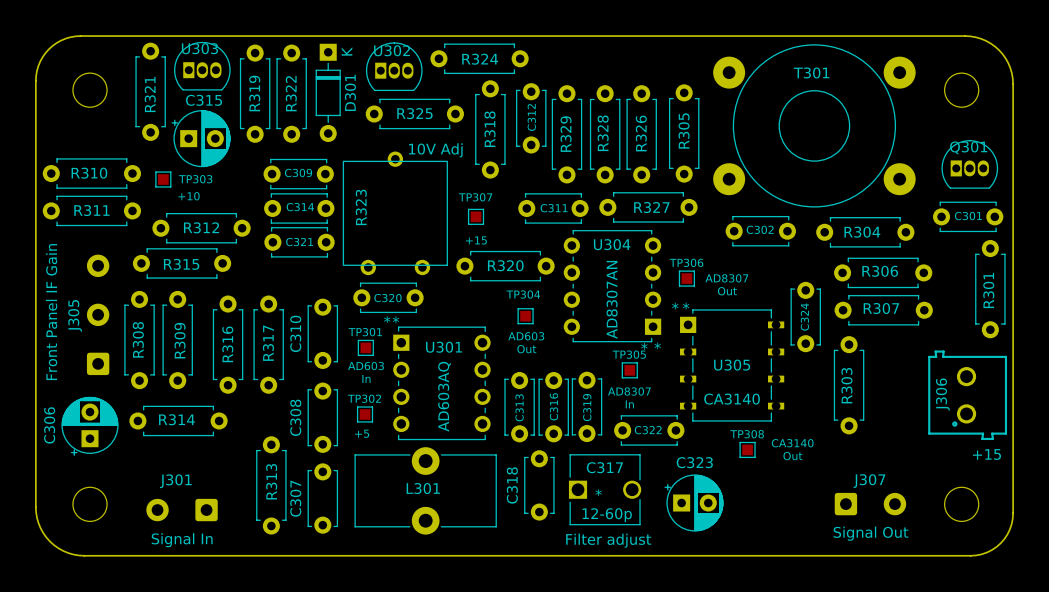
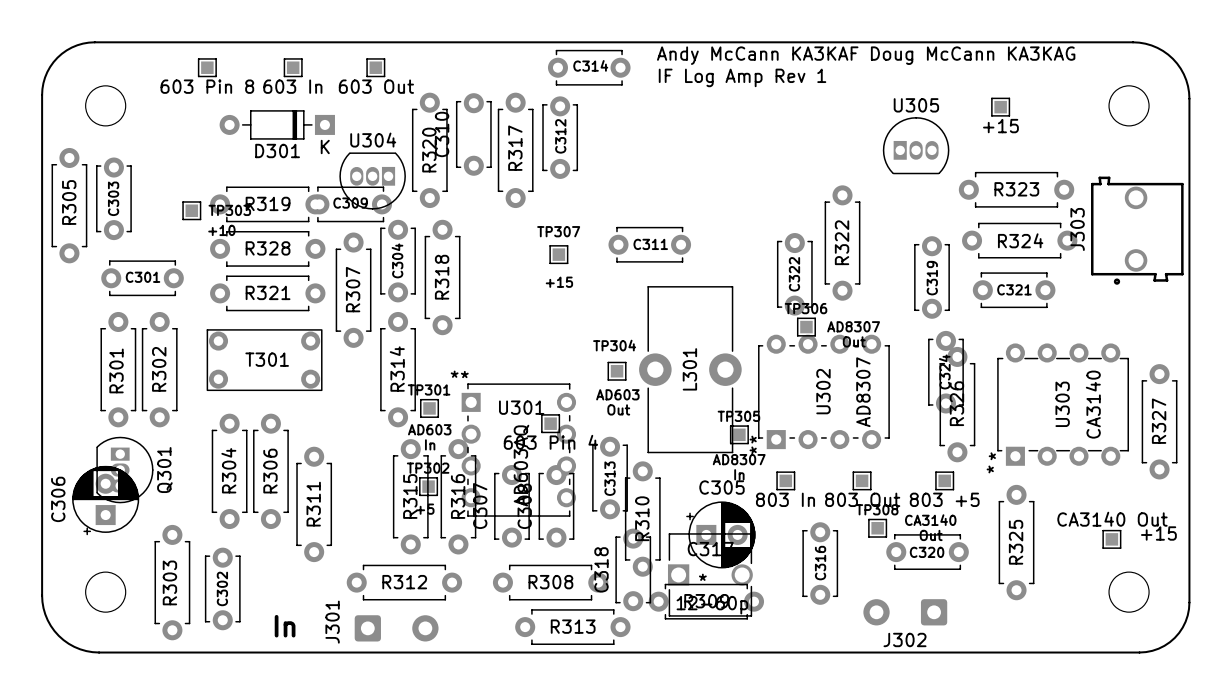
U303 footprint: [173, 41, 231, 91] -> [997, 343, 1130, 466]
U302 footprint: [365, 42, 423, 92] -> [758, 334, 890, 450]
T301 footprint: [713, 44, 916, 208] -> [206, 329, 323, 392]
text: none -> Andy McCann KA3KAF Doug McCann KA3KAG (866, 55)
part: none -> 603 Pin 8 (207, 67)
part: none -> 603 In (293, 67)
part: none -> 603 Out (375, 67)
R324 position: (479, 58) -> (1019, 240)
text: none -> IF Log Amp Rev 1 (742, 77)
T301 name position: T301 (811, 72) -> T301 (267, 359)
R321 rotation: 0° (150, 91) -> 90° clockwise (267, 293)
R321 position: (150, 91) -> (267, 293)
part: none -> +15 (1000, 107)
D301 rotation: 0° (328, 92) -> 90° clockwise (277, 124)
D301 position: (328, 92) -> (277, 124)
R319 rotation: 0° (255, 93) -> 90° clockwise (267, 204)
R319 position: (255, 93) -> (267, 204)
R322 position: (291, 93) -> (842, 243)
R325 rotation: 0° (414, 113) -> 90° clockwise (1016, 542)
R325 position: (414, 113) -> (1016, 542)
C312 position: (531, 118) -> (560, 137)
R318 position: (490, 129) -> (442, 277)
R305 position: (684, 133) -> (69, 205)
R329: (566, 134) -> none
R328 rotation: 0° (605, 134) -> 90° clockwise (267, 248)
R328 position: (605, 134) -> (267, 248)
R326 position: (641, 134) -> (957, 404)
C315: (201, 138) -> none
text: 10V Adj (435, 150) -> none
R323 footprint: [342, 151, 448, 276] -> [958, 171, 1075, 208]
Q301 rotation: 0° (969, 164) -> 90° clockwise (124, 470)
Q301 position: (969, 164) -> (124, 470)
C303: none -> (113, 198)
R310 rotation: 0° (91, 173) -> 90° clockwise (642, 519)
R310 position: (91, 173) -> (642, 519)
J303: none -> (1137, 230)
R323 name position: R323 (361, 207) -> R323 (1016, 189)
R327 rotation: 0° (648, 207) -> 90° clockwise (1159, 421)
R327 position: (648, 207) -> (1159, 421)
C314 position: (299, 208) -> (589, 67)
R311 rotation: 0° (91, 210) -> 90° clockwise (314, 504)
R311 position: (91, 210) -> (314, 504)
C301 position: (968, 216) -> (142, 278)
C304: none -> (398, 261)
R312 position: (201, 228) -> (404, 582)
U304 footprint: [563, 230, 662, 343] -> [339, 152, 406, 210]
C302 rotation: 0° (760, 231) -> 90° clockwise (222, 588)
C302 position: (760, 231) -> (222, 588)
R304 rotation: 0° (865, 232) -> 90° clockwise (229, 471)
R304 position: (865, 232) -> (229, 471)
C321 position: (299, 242) -> (1014, 290)
R315 rotation: 0° (182, 263) -> 90° clockwise (410, 496)
R315 position: (182, 263) -> (410, 496)
R320 rotation: 0° (505, 266) -> 90° clockwise (429, 150)
R320 position: (505, 266) -> (429, 150)
R306 rotation: 0° (883, 272) -> 90° clockwise (270, 471)
R306 position: (883, 272) -> (270, 471)
R301 position: (990, 289) -> (118, 369)
C320 position: (388, 297) -> (927, 552)
U304 value: AD8307AN (612, 299) -> none
U305 footprint: [680, 309, 785, 422] -> [882, 117, 950, 175]
R307 rotation: 0° (883, 310) -> 90° clockwise (353, 290)
R307 position: (883, 310) -> (353, 290)
text: Front Panel IF Gain (51, 312) -> none
J305: (98, 314) -> none
R302: none -> (159, 369)
C310 position: (322, 333) -> (473, 134)
U302 value: none -> AD8307 (863, 392)
R308 rotation: 0° (139, 340) -> 90° clockwise (550, 582)
R308 position: (139, 340) -> (550, 582)
R309 rotation: 0° (177, 340) -> 90° clockwise (706, 601)
R309 position: (177, 340) -> (706, 601)
R316 position: (228, 344) -> (458, 496)
R317 position: (268, 344) -> (515, 150)
U303 value: none -> CA3140 (1093, 404)
part: none -> 603 Pin 4 (550, 423)
U305 name position: U305 (732, 365) -> U305 (916, 105)
R303 position: (849, 385) -> (172, 582)
J306: (967, 395) -> none
U305 value: CA3140 (732, 399) -> none
C319 position: (587, 406) -> (932, 277)
C316 position: (553, 407) -> (820, 563)
part: none -> 803 In (785, 480)
part: none -> 803 Out (862, 480)
part: none -> 803 +5 (944, 480)
C308 position: (322, 417) -> (556, 506)
R314 rotation: 0° (178, 420) -> 90° clockwise (398, 369)
R314 position: (178, 420) -> (398, 369)
C322 rotation: 0° (649, 430) -> 90° clockwise (794, 274)
C322 position: (649, 430) -> (794, 274)
C305: none -> (720, 534)
part: none -> CA3140 Out (1111, 539)
J301 name position: J301 (175, 481) -> J301 (332, 622)
R313 rotation: 0° (271, 485) -> 90° clockwise (572, 627)
R313 position: (271, 485) -> (572, 627)
L301 rotation: 0° (425, 490) -> 90° clockwise (690, 369)
L301 position: (425, 490) -> (690, 369)
C307 position: (322, 498) -> (511, 506)
C323: (693, 503) -> none
J307: (870, 504) -> none
J301 rotation: 0° (182, 510) -> 180° (396, 628)
J301 position: (182, 510) -> (396, 628)
J302: none -> (905, 612)
text: none -> In (285, 626)
text: Signal Out (871, 533) -> none
text: Signal In (182, 540) -> none
text: Filter adjust (608, 540) -> none

